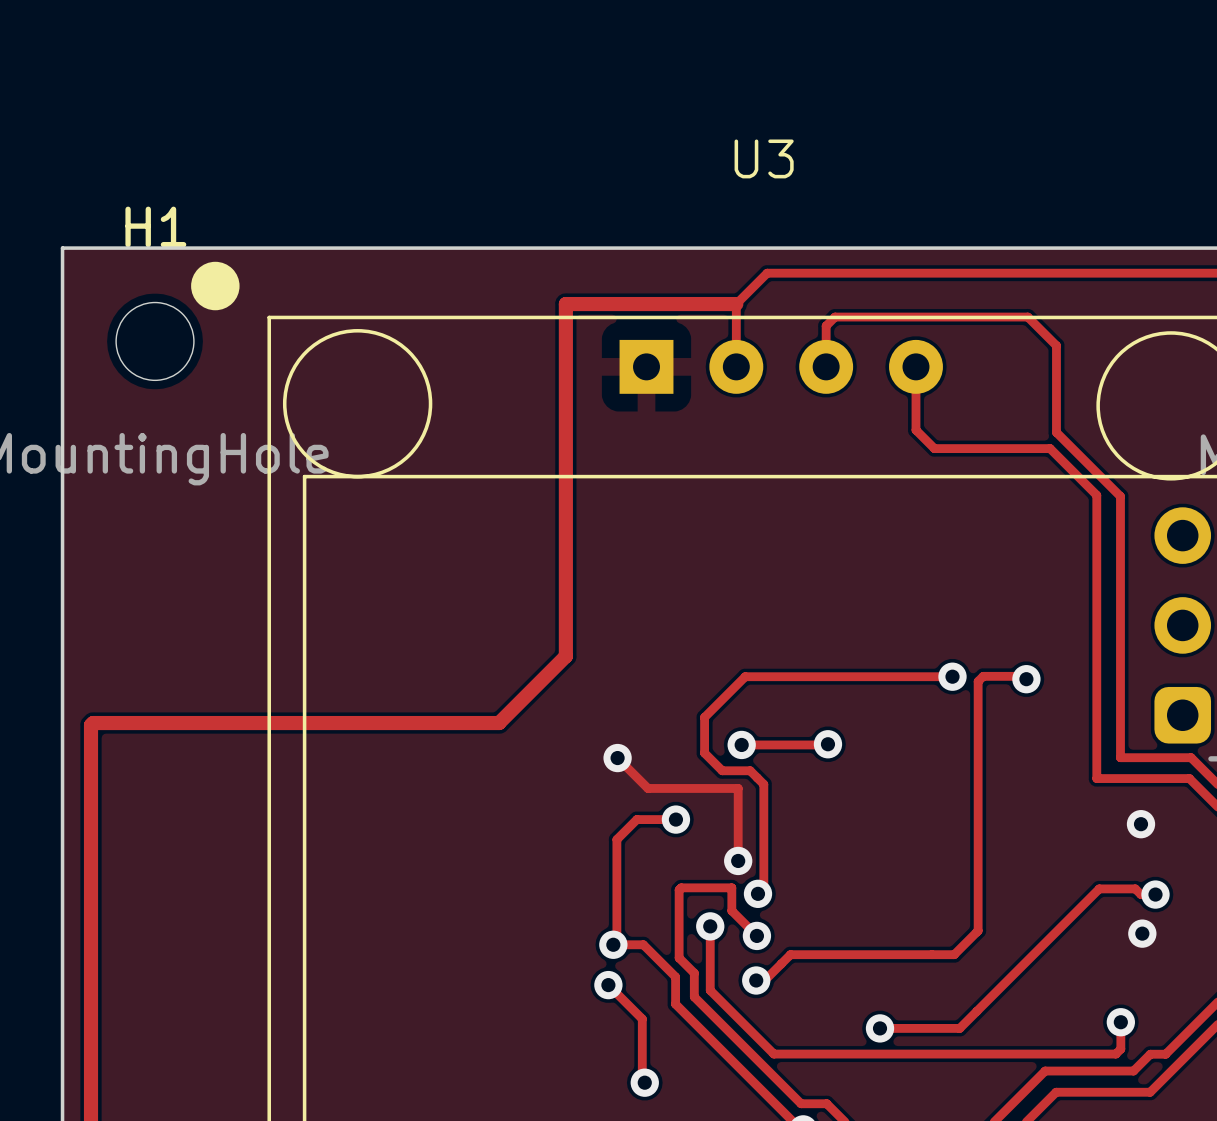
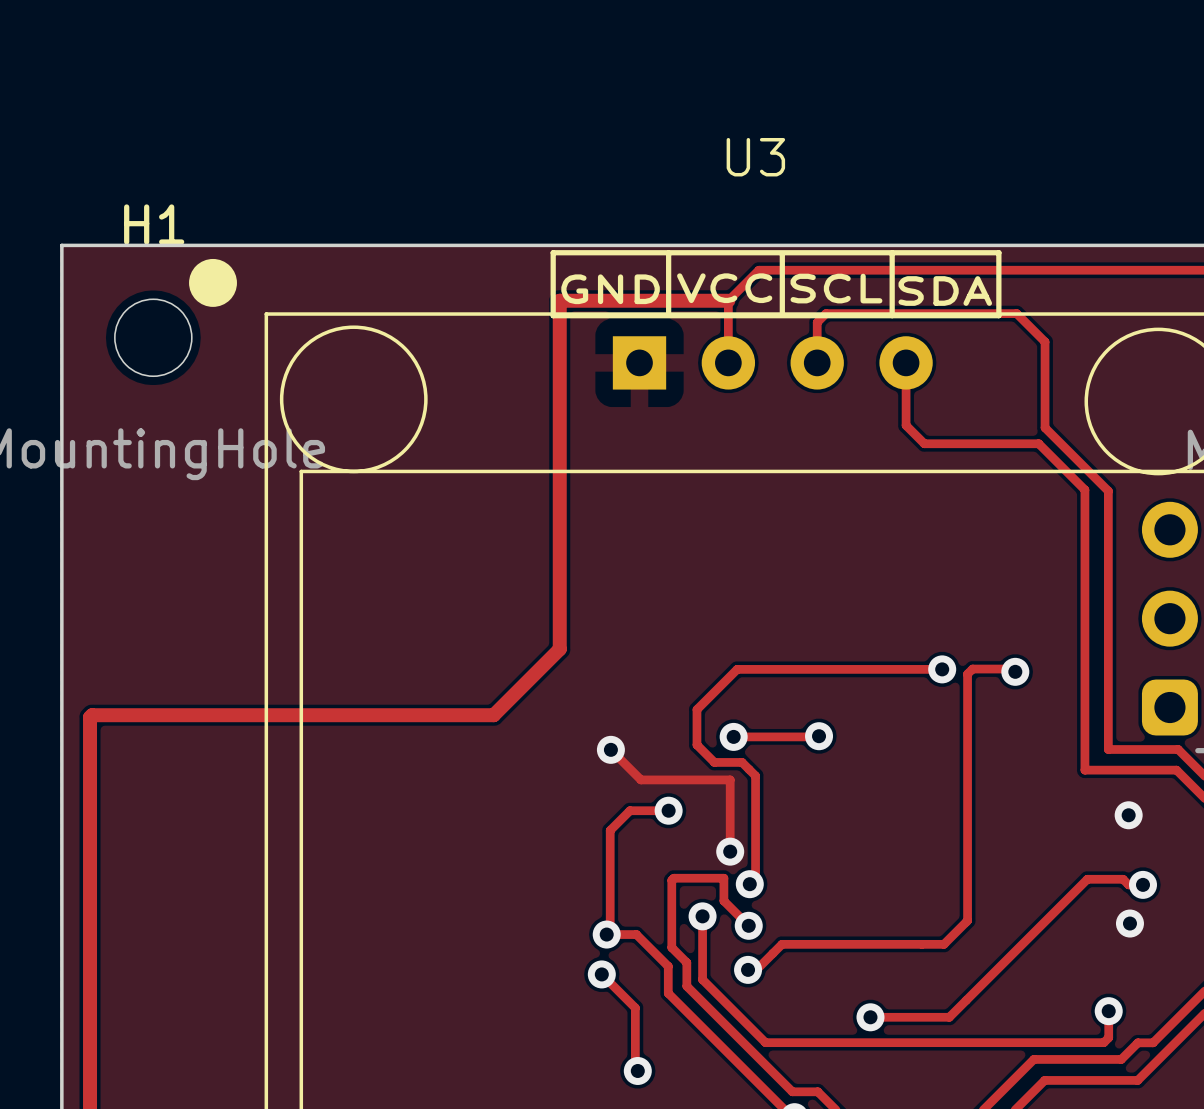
line: none -> (553, 252) (998, 252) (998, 315) (553, 315) (553, 252)
line: none -> (668, 253) (668, 315)
line: none -> (892, 253) (892, 315)
line: none -> (782, 254) (782, 315)
text: none -> VCC (724, 288)
text: none -> SCL (836, 288)
text: none -> GND (610, 289)
text: none -> SDA (945, 291)

